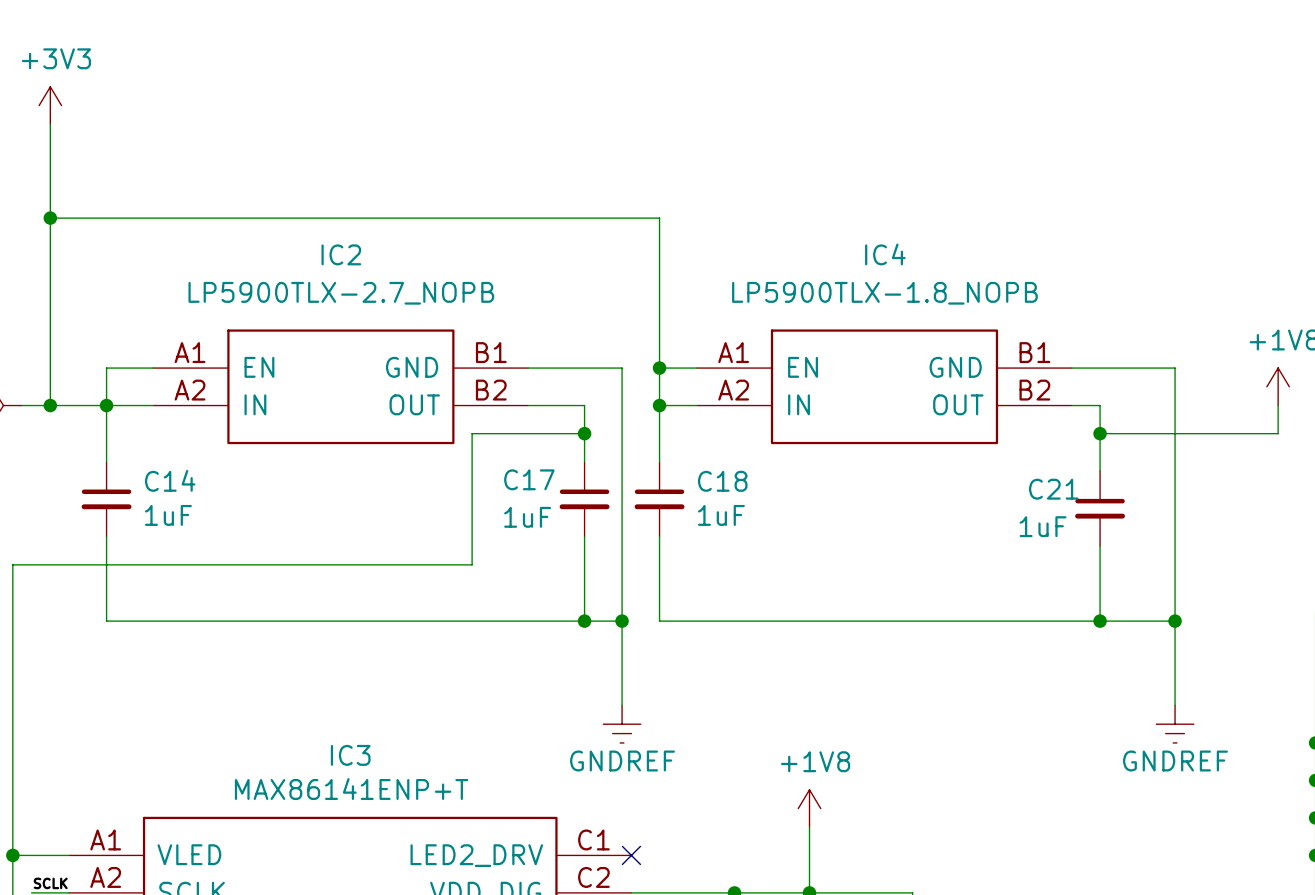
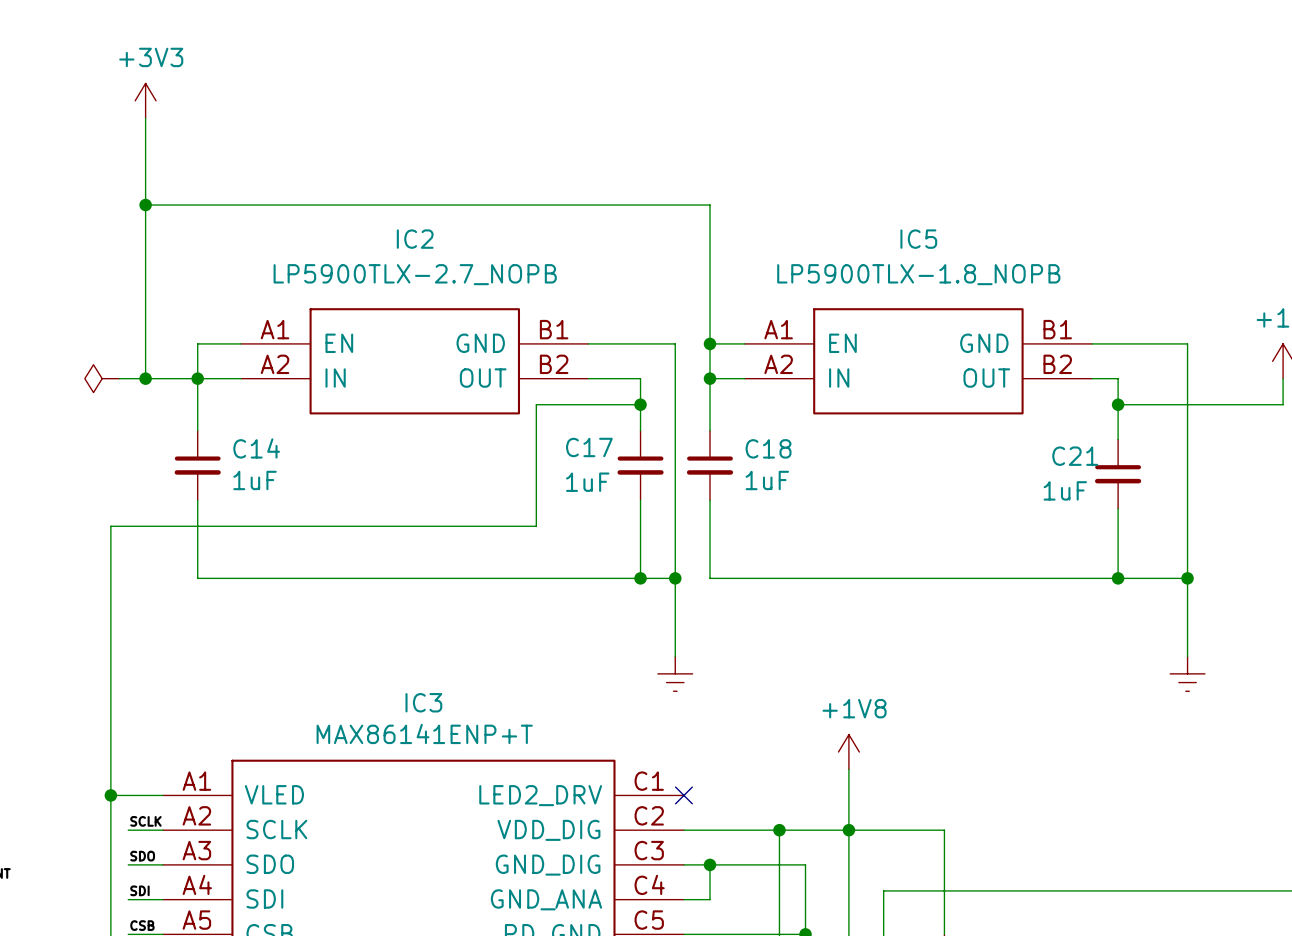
IC4 name: IC4 (885, 254) -> IC5 (918, 239)
power symbol text: GNDREF (622, 761) -> none
power symbol text: GNDREF (1175, 761) -> none

